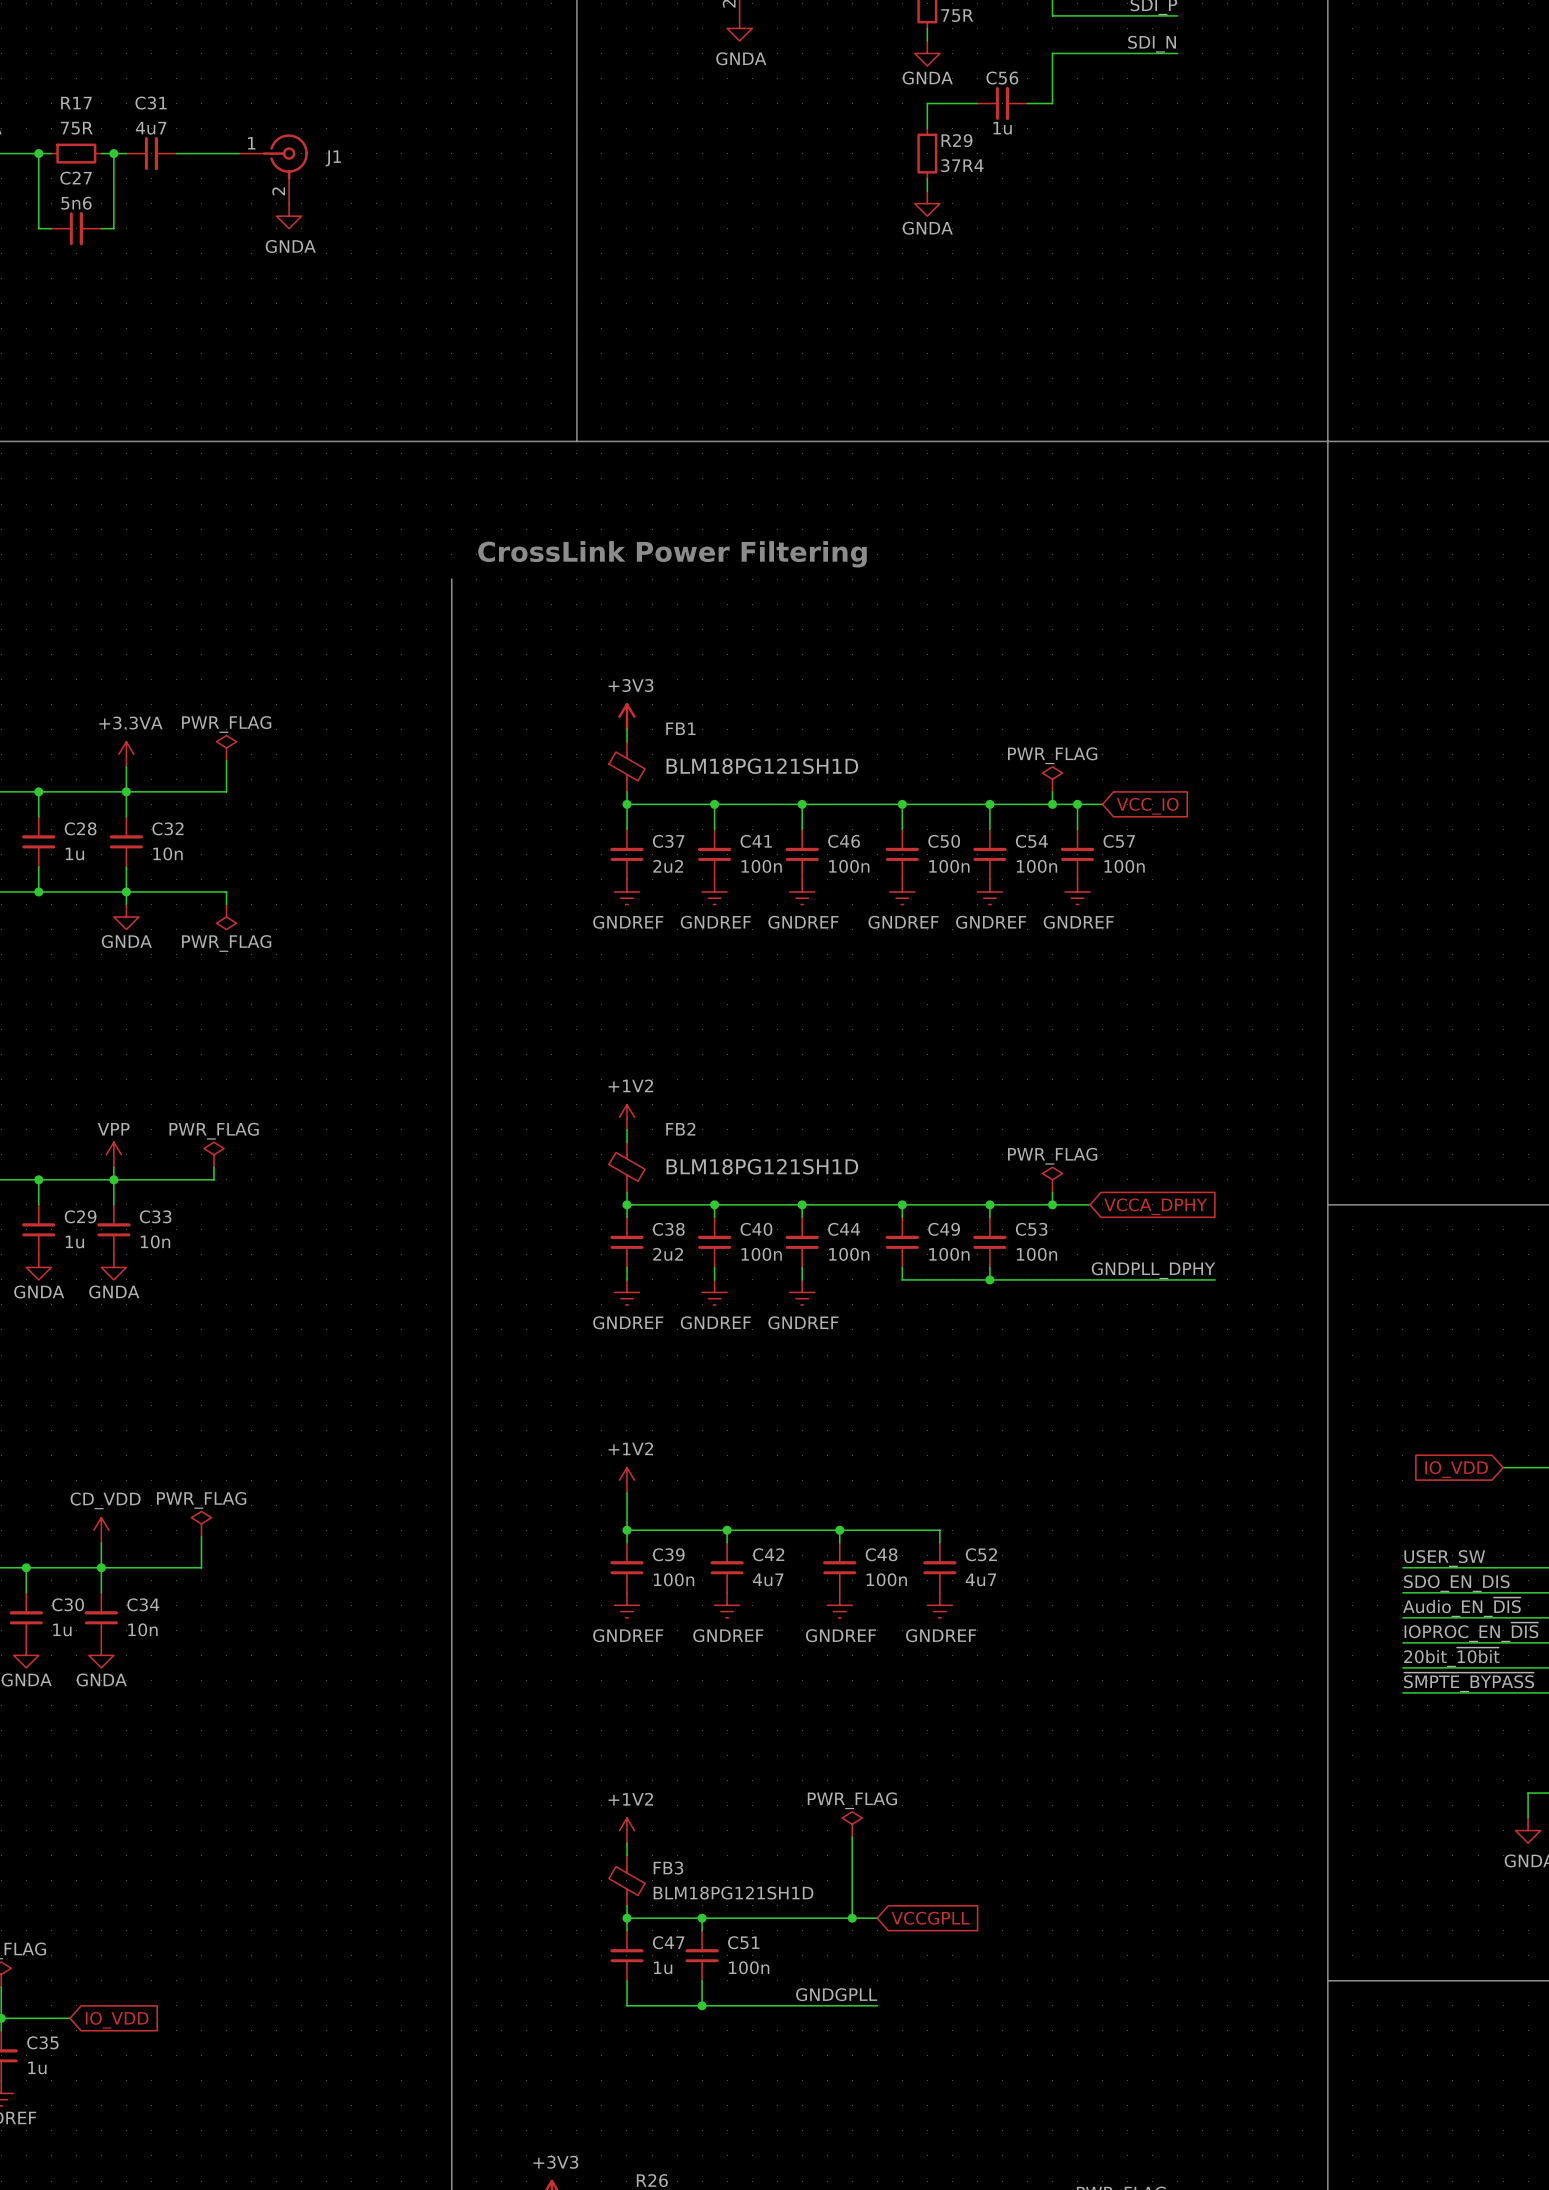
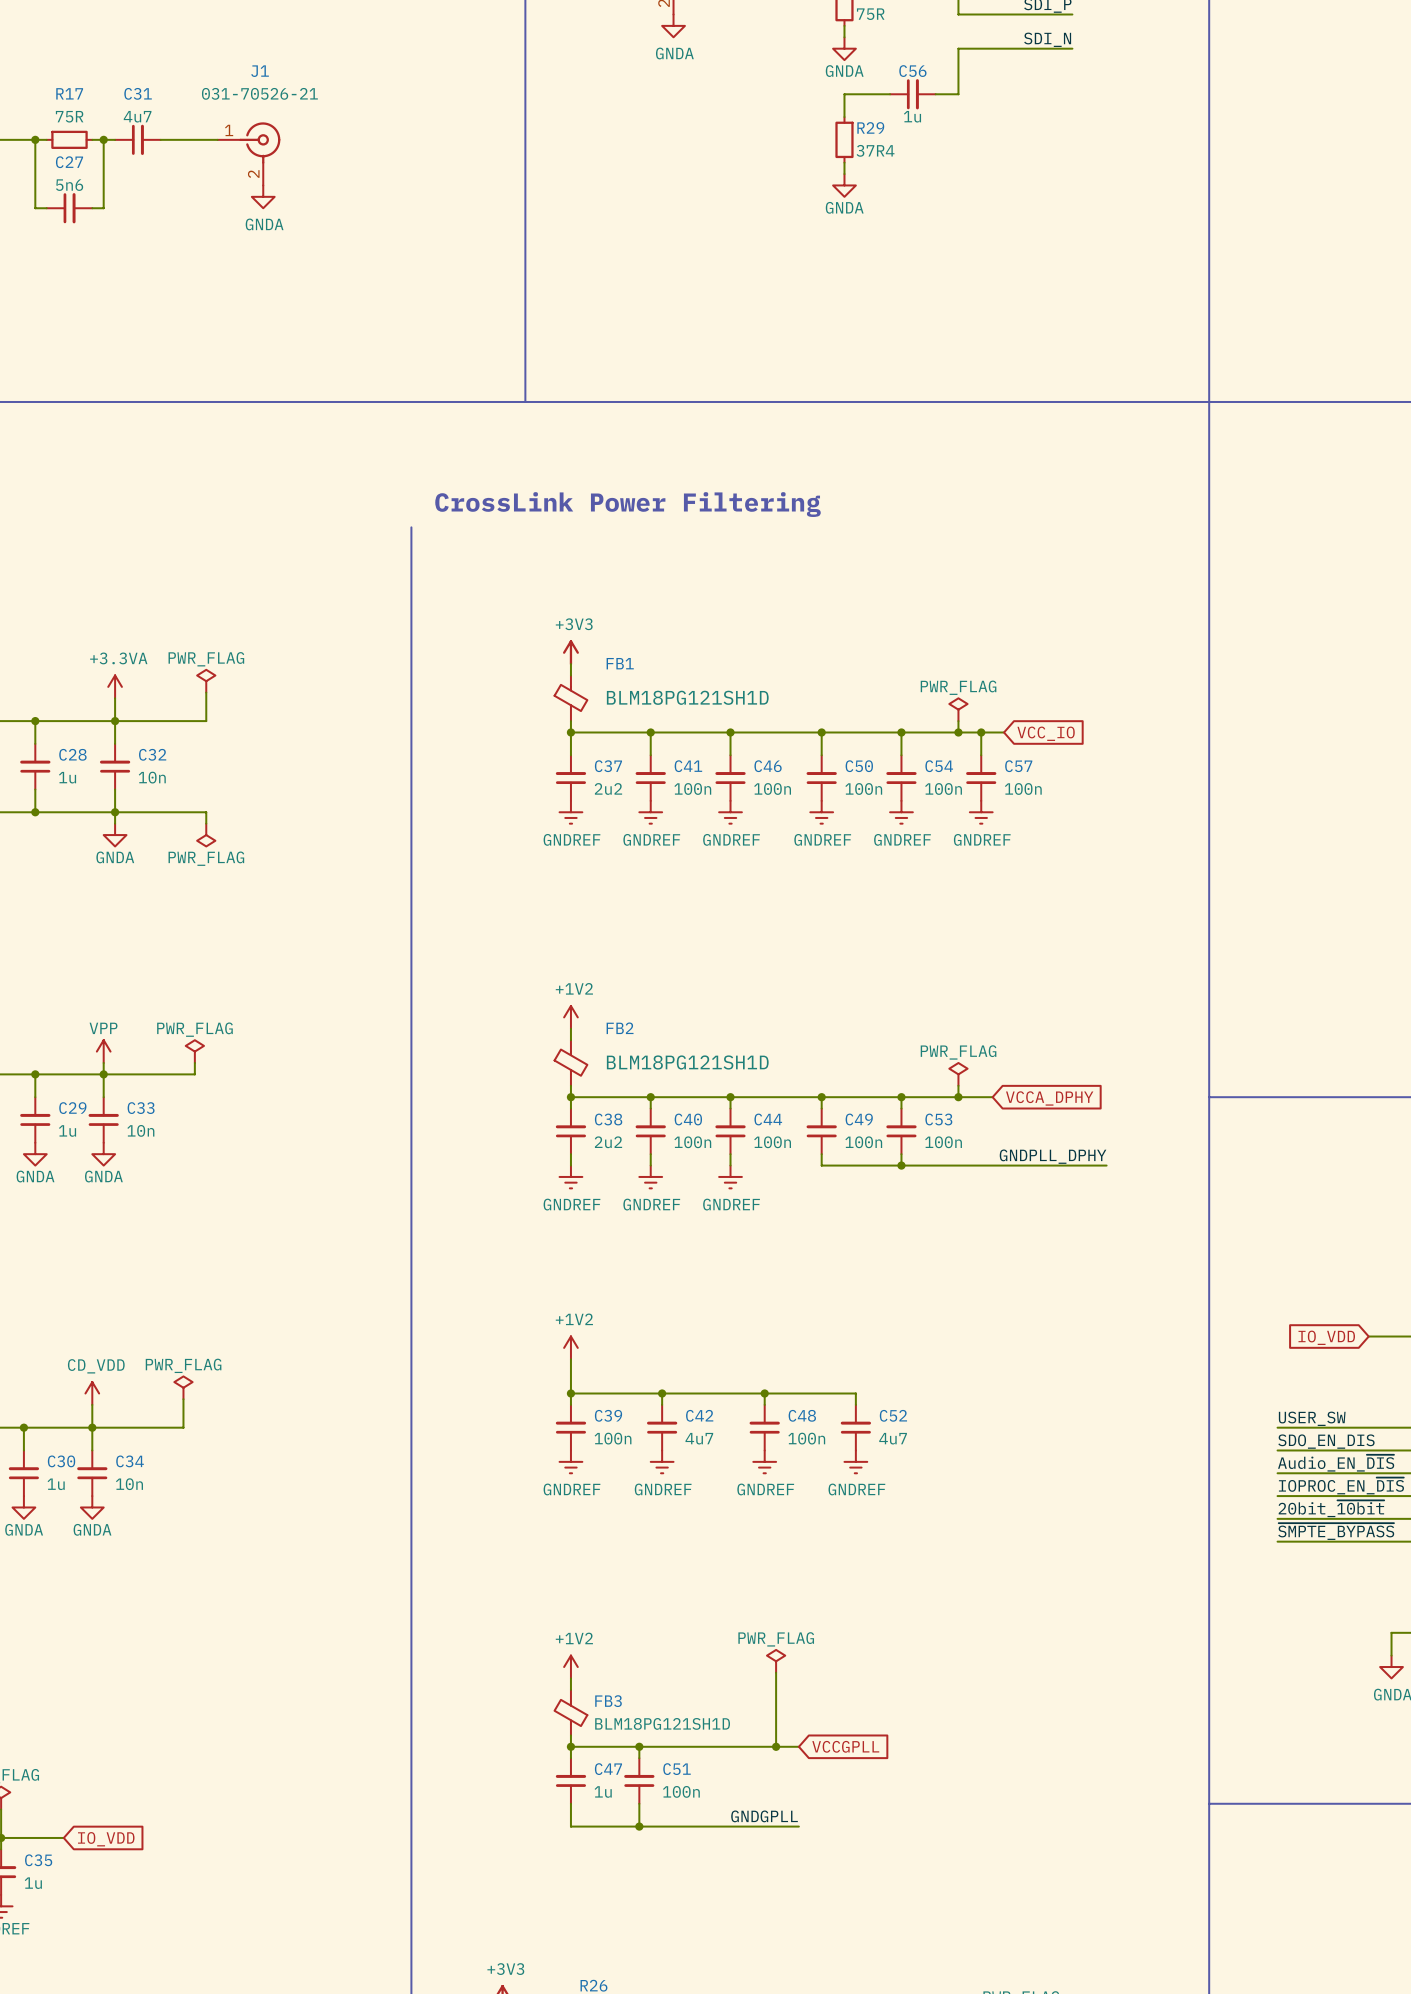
J1 text: none -> 031-70526-21 (259, 93)
J1 name position: J1 (333, 158) -> J1 (260, 71)

